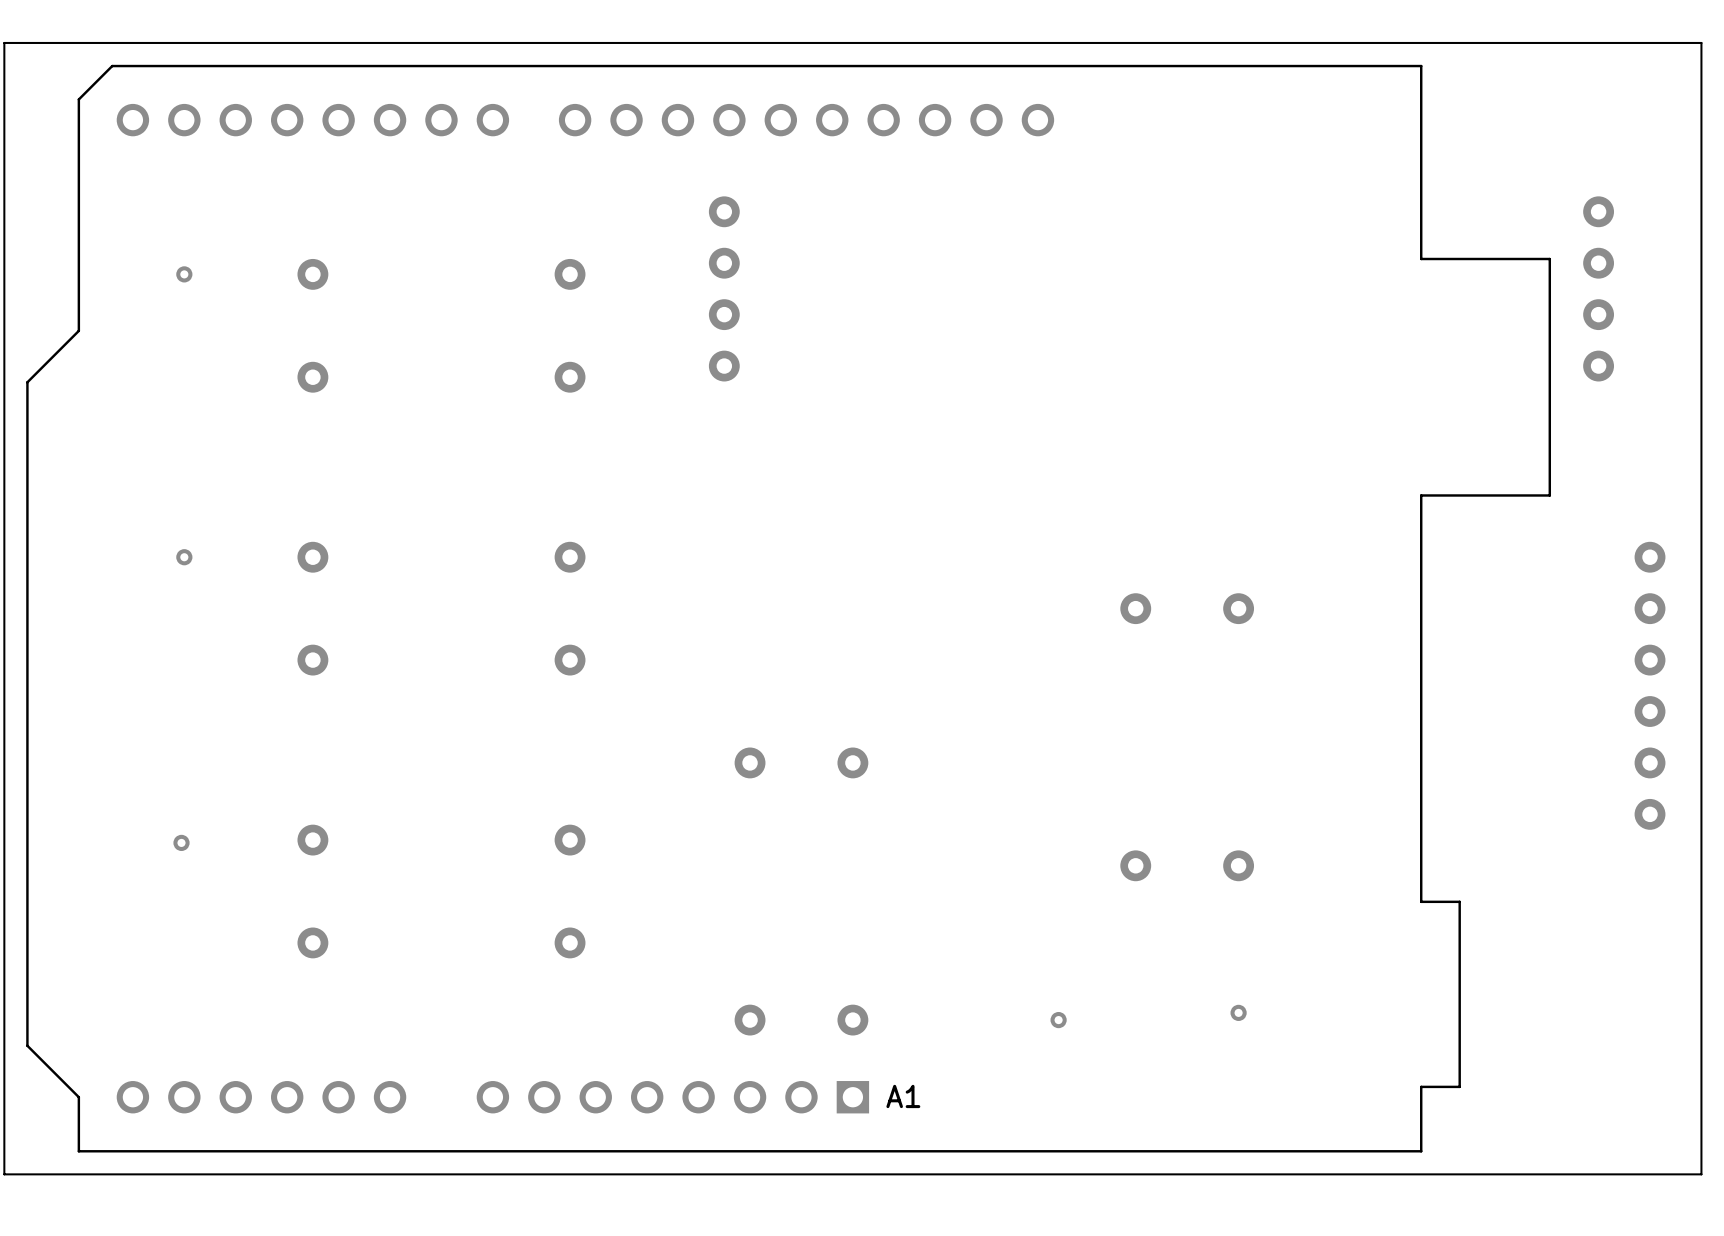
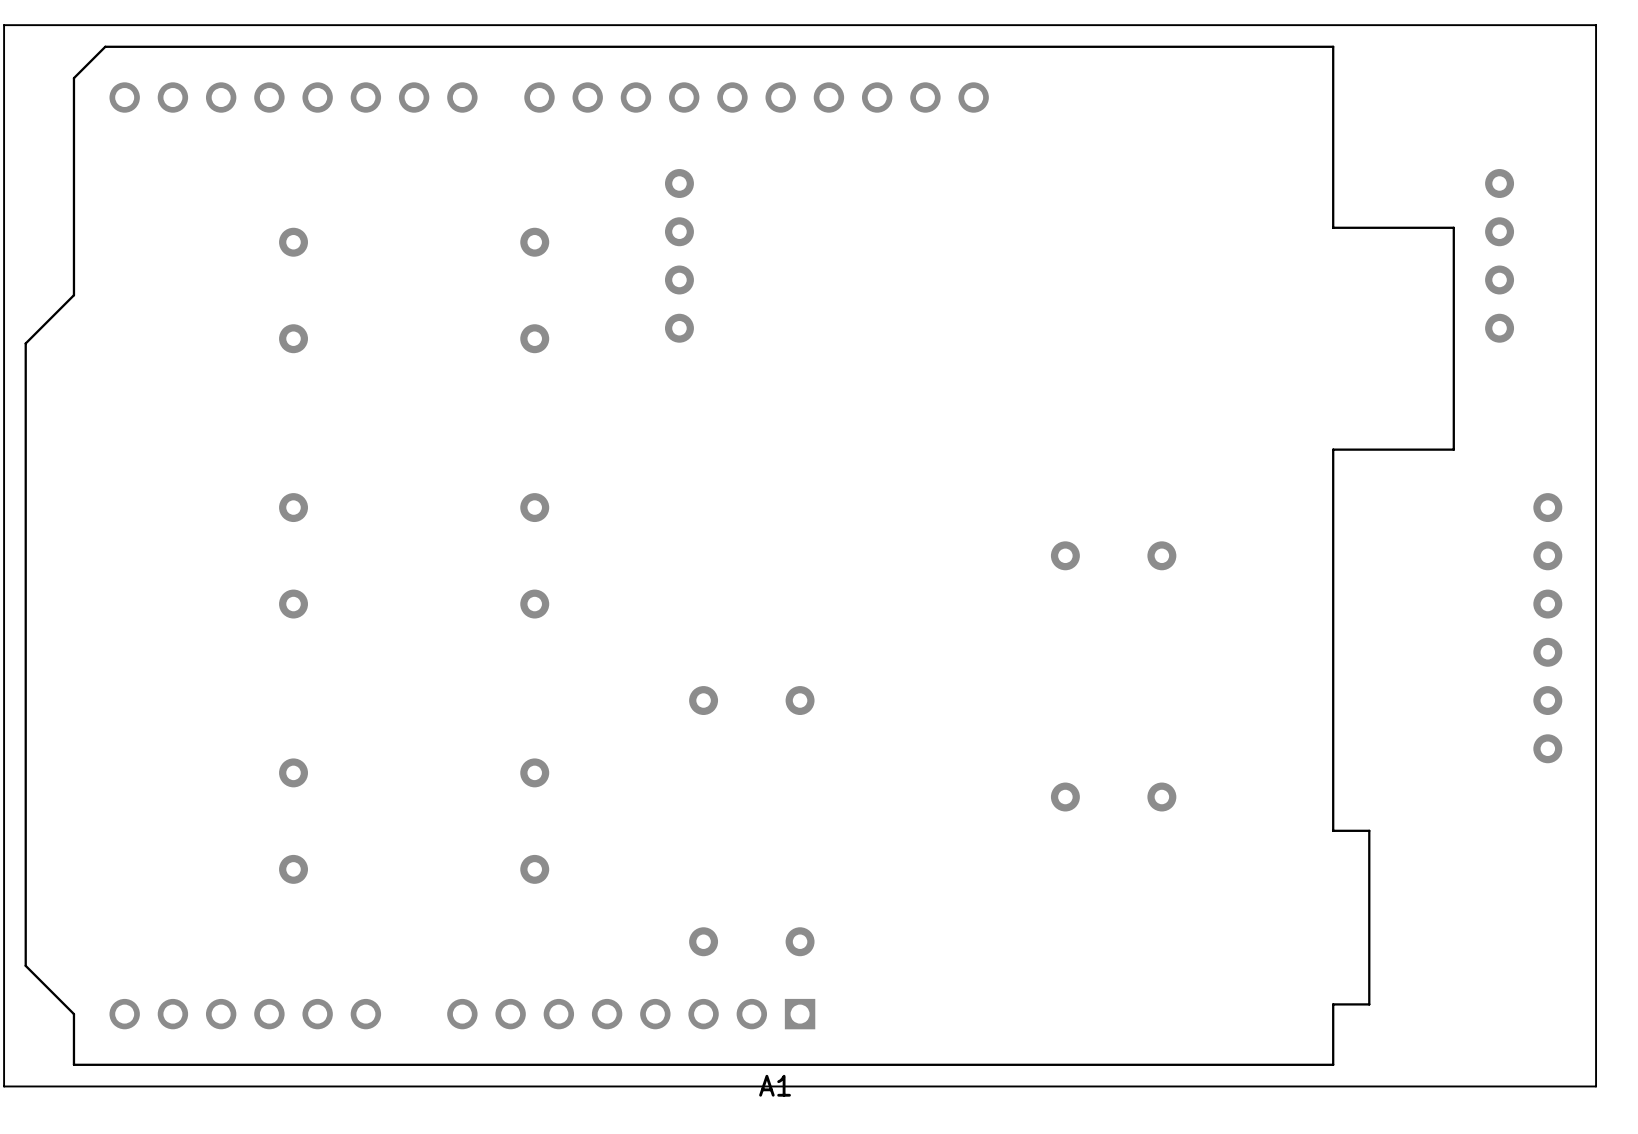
via: (184, 274) -> none
via: (184, 557) -> none
via: (181, 842) -> none
via: (1238, 1012) -> none
via: (1058, 1020) -> none
A1 name position: A1 (903, 1096) -> A1 (775, 1085)

